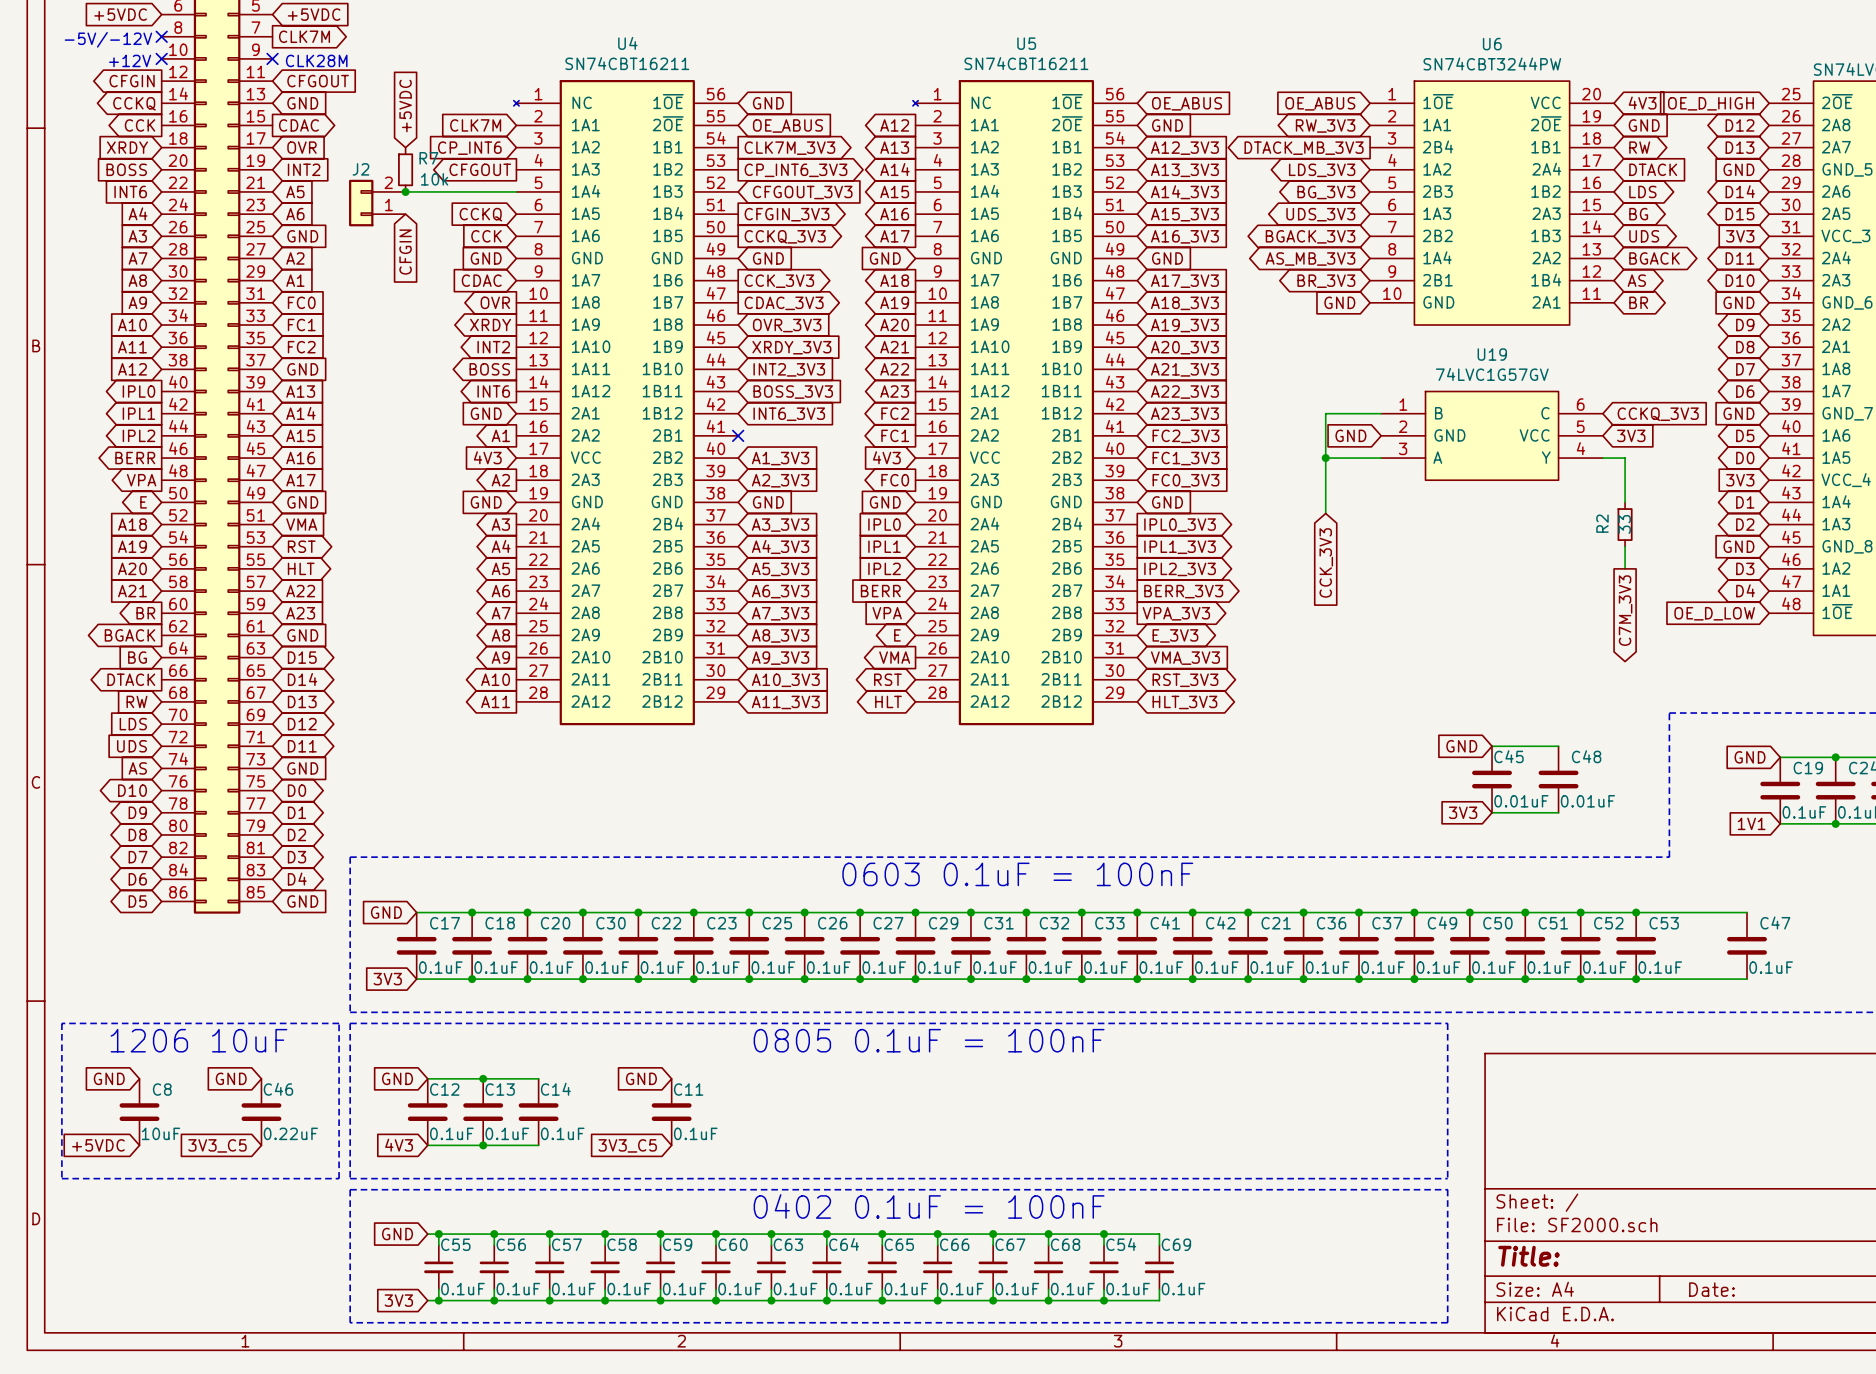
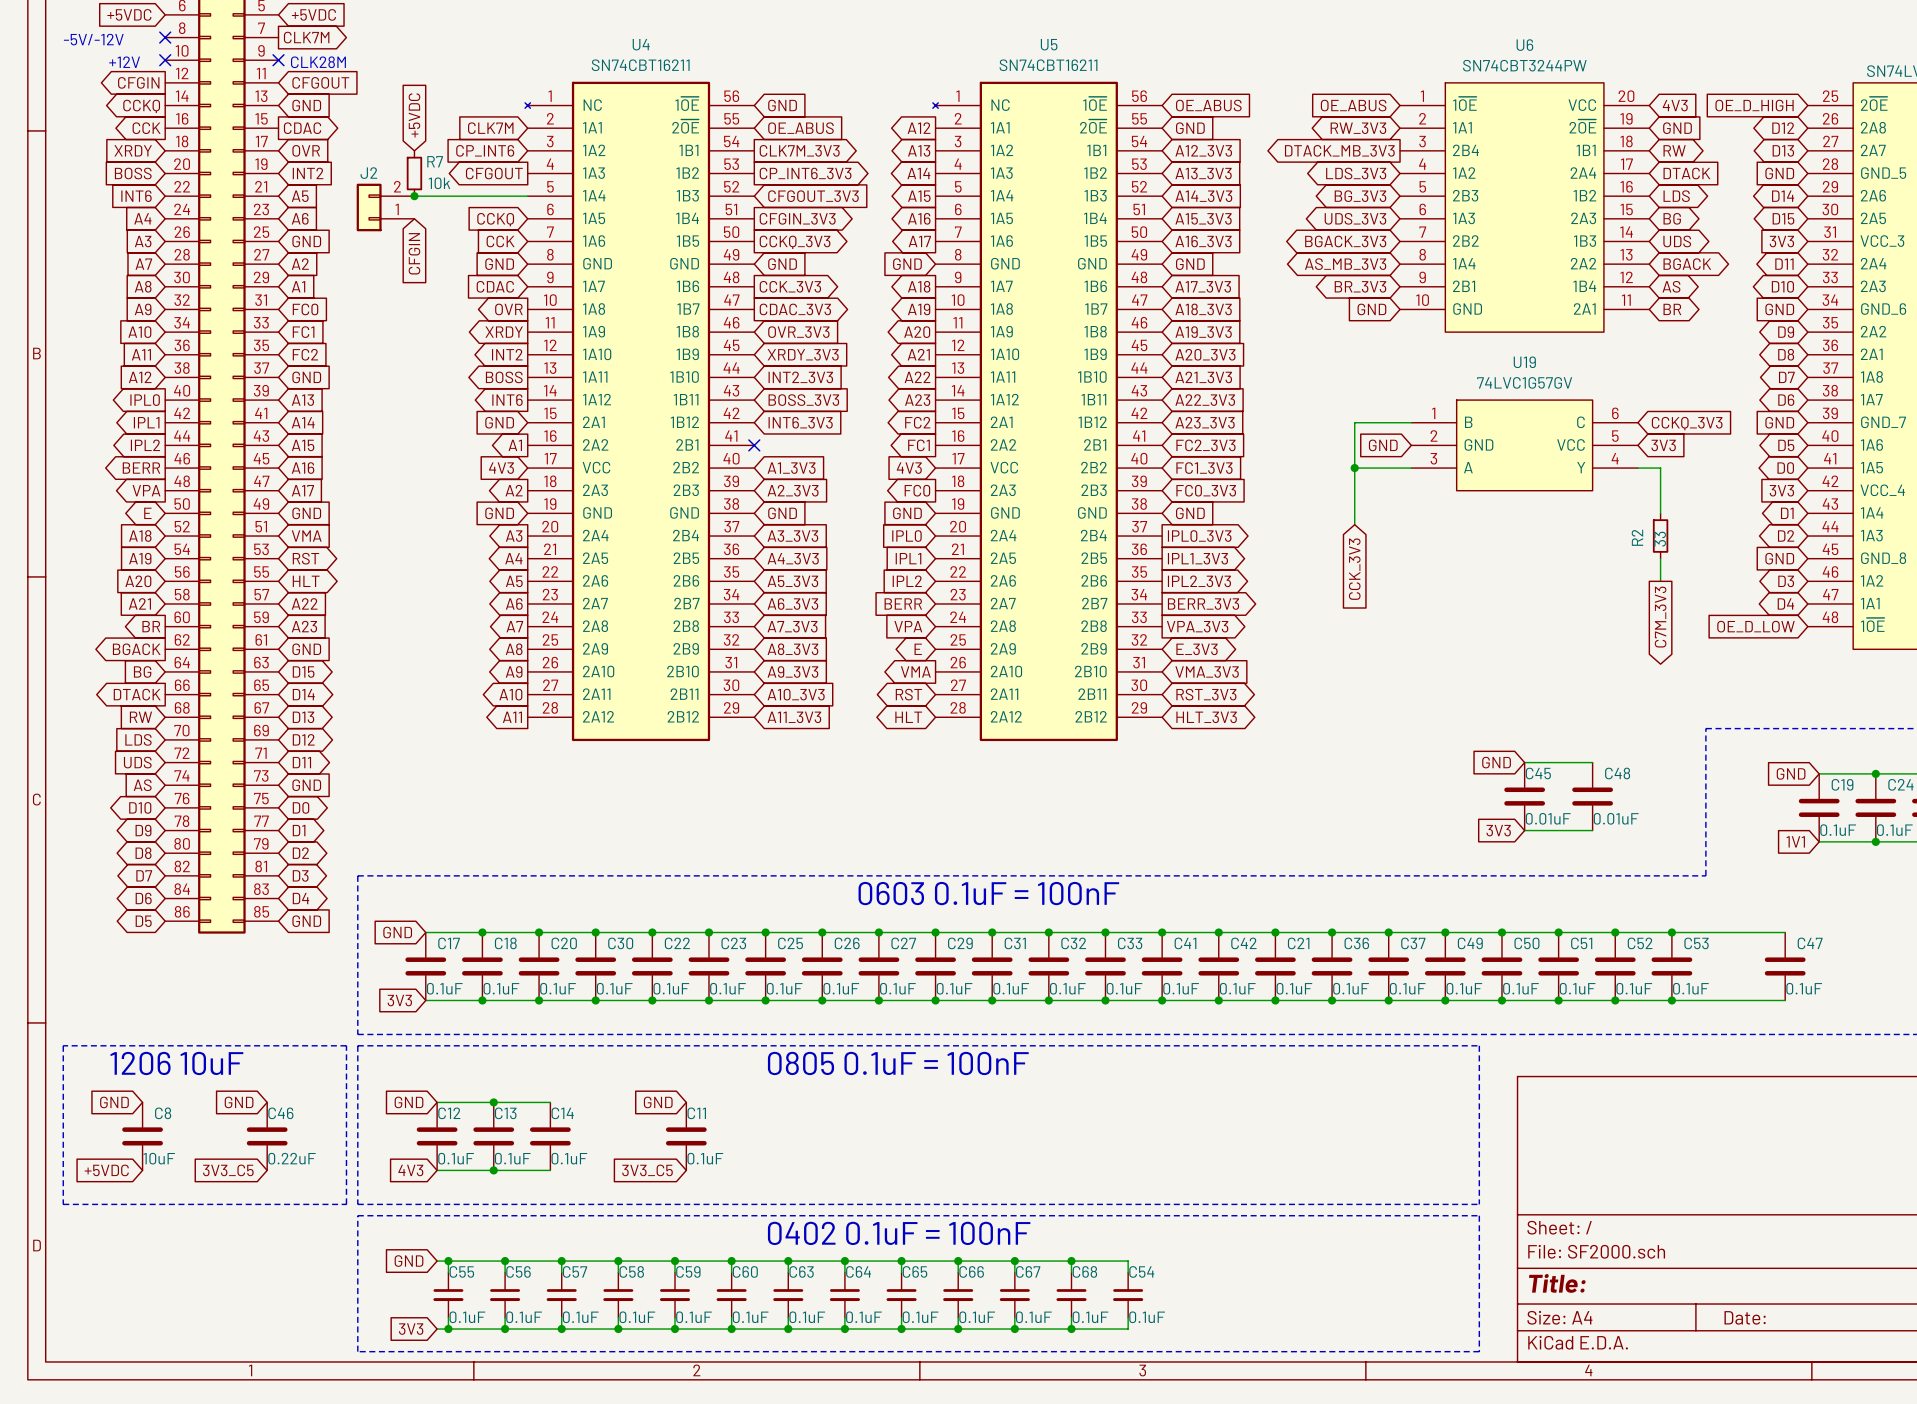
wire: (1104, 1234) (1159, 1234) (1159, 1245) -> none
junction: (1104, 1234) -> none
C69: 0.1uF (1159, 1267) -> none
wire: (1159, 1289) (1159, 1300) (1104, 1300) -> none
junction: (1104, 1300) -> none

